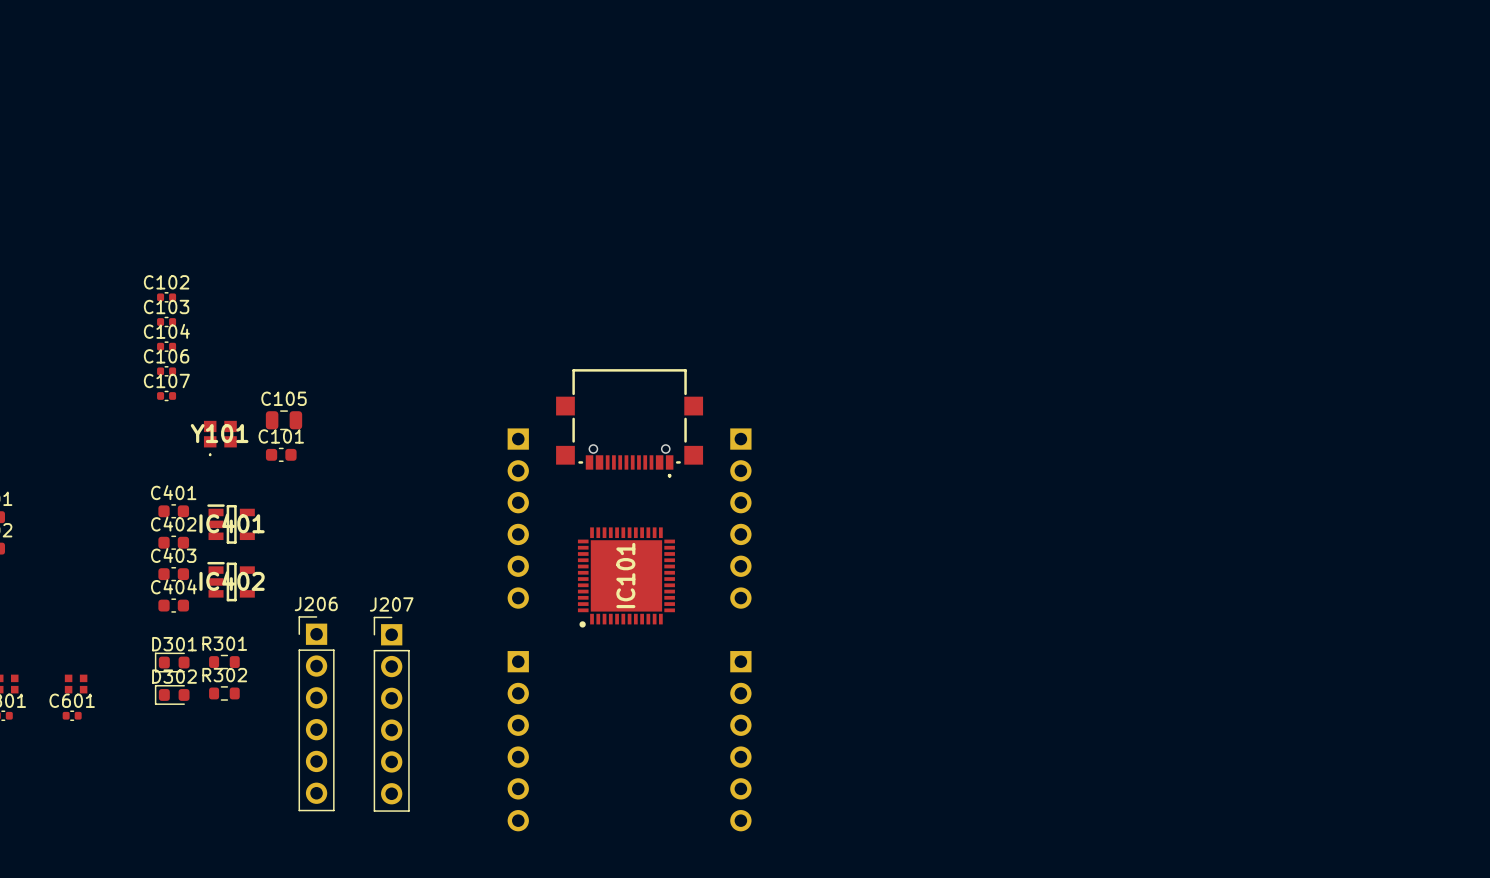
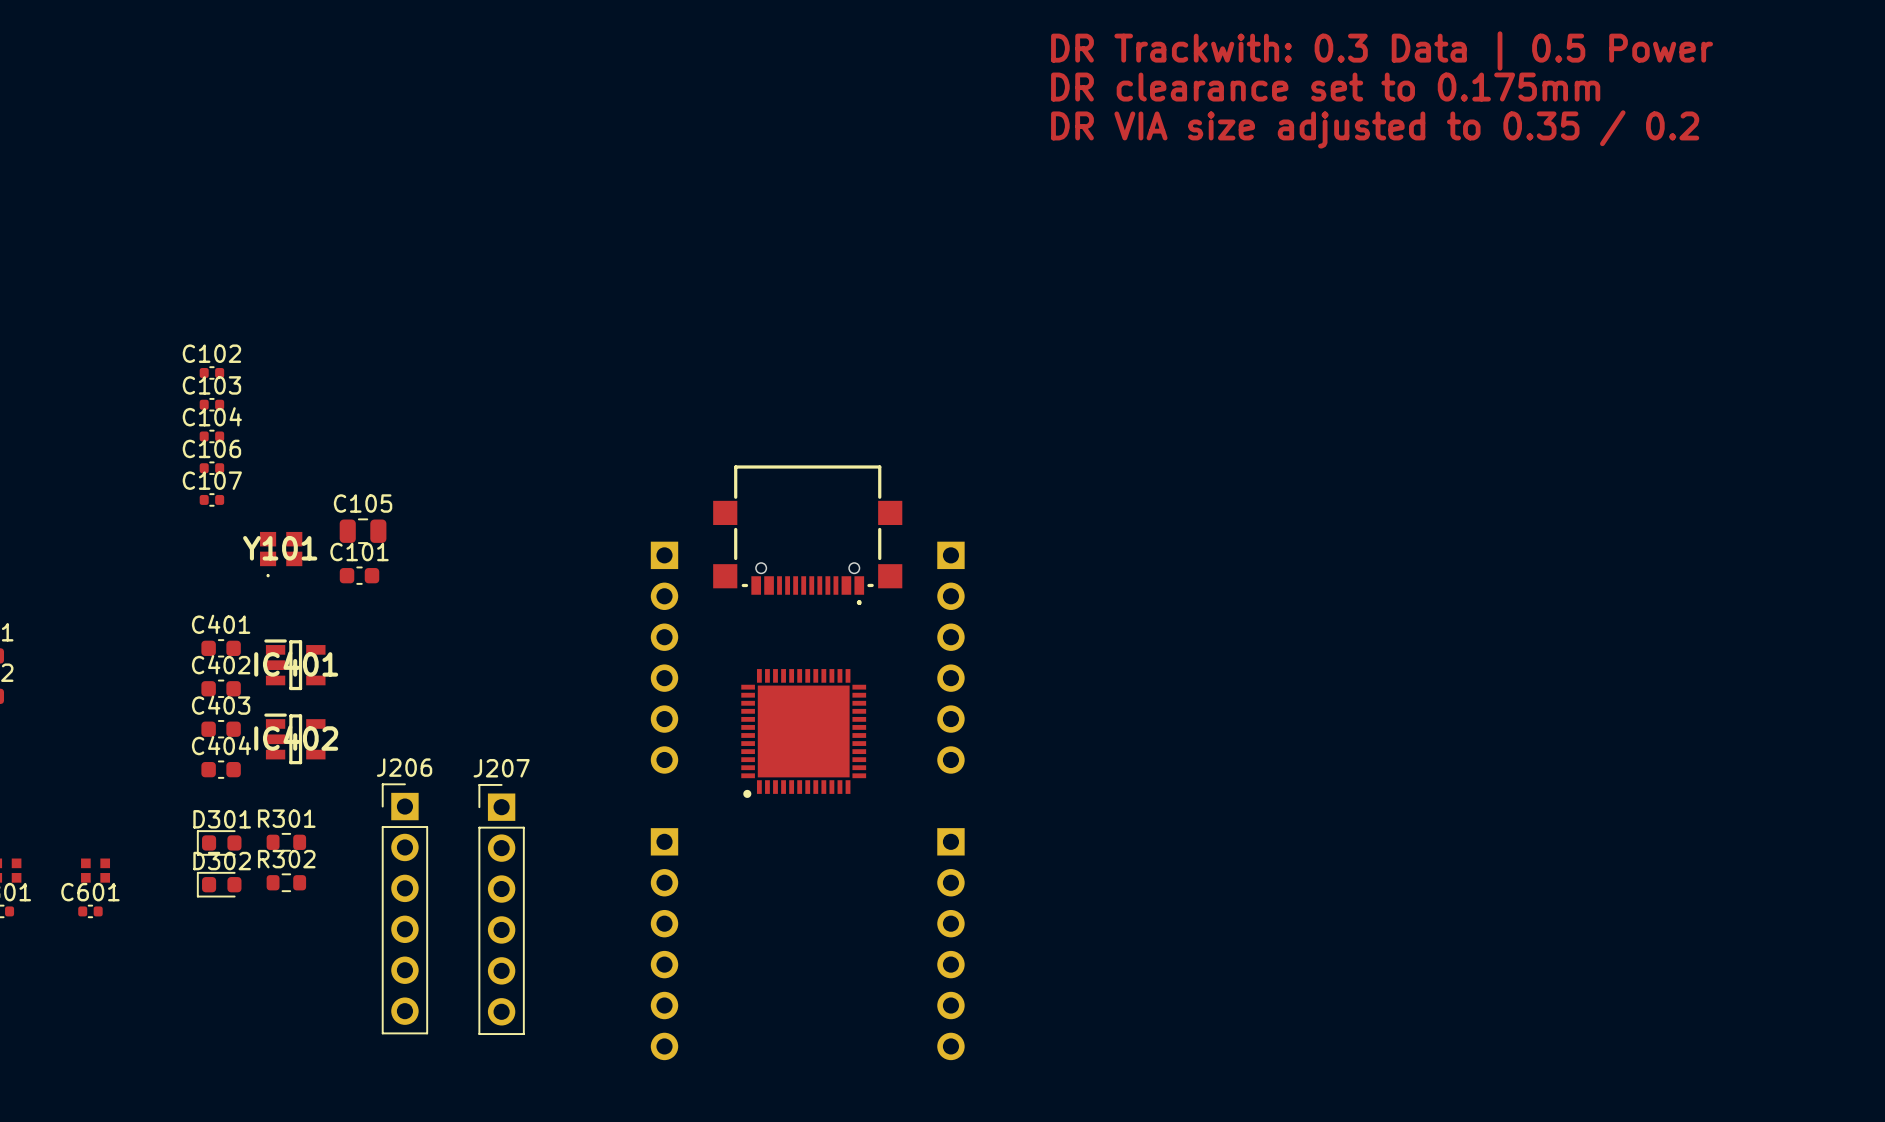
text: none -> DR Trackwith: 0.3 Data | 0.5 Power (1382, 51)
text: none -> DR clearance set to 0.175mm (1325, 87)
text: none -> DR VIA size adjusted to 0.35 / 0.2 (1375, 129)
IC101 name: IC101 (625, 575) -> none

